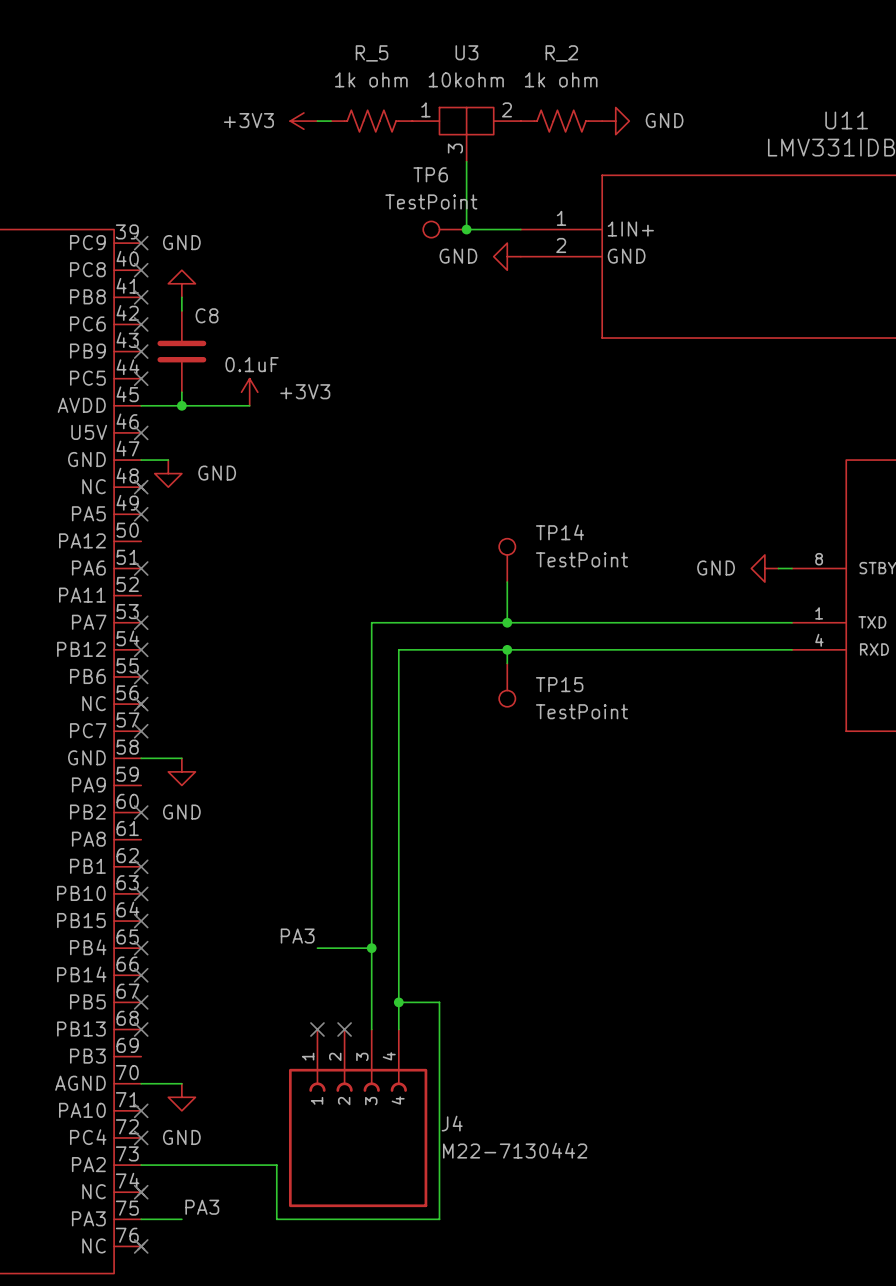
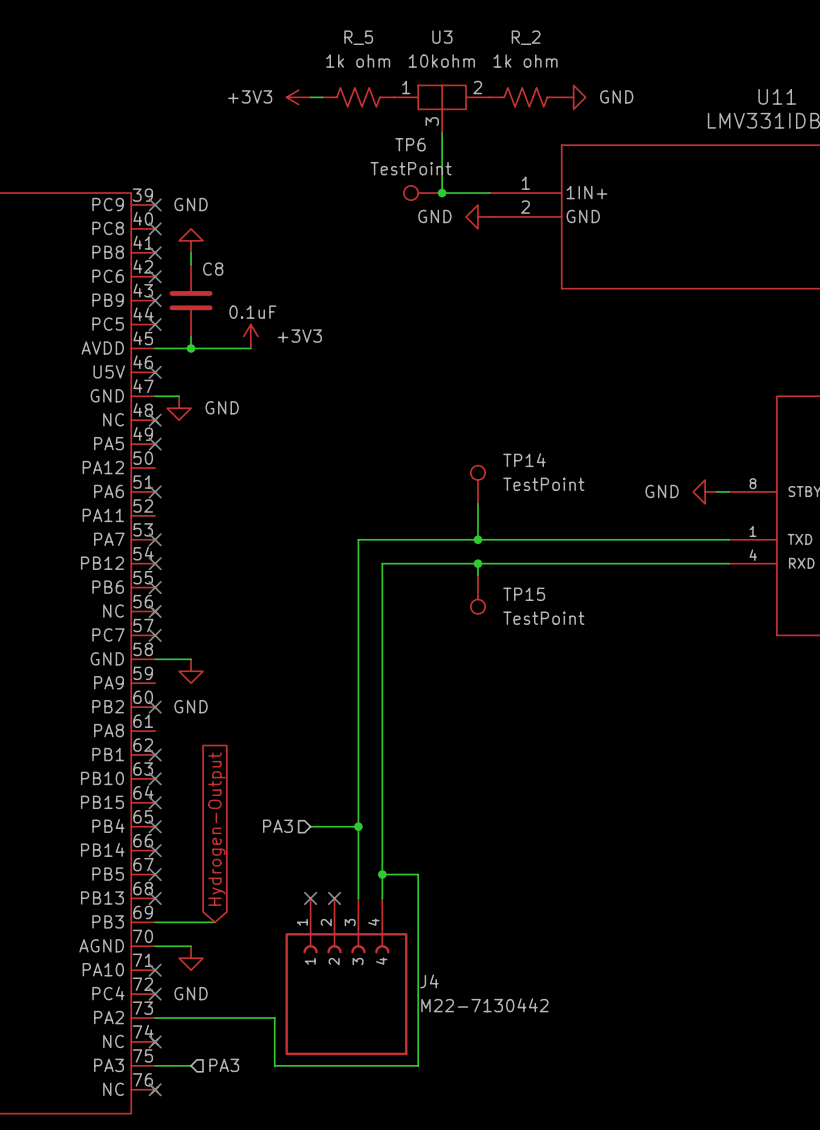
label: PA3 (297, 936) -> none
hierarchical label: none -> PA3 (277, 826)
global label: none -> Hydrogen-Output (216, 829)
wire: none -> (155, 922) (214, 922)
label: PA3 (202, 1207) -> none
hierarchical label: none -> PA3 (224, 1065)

